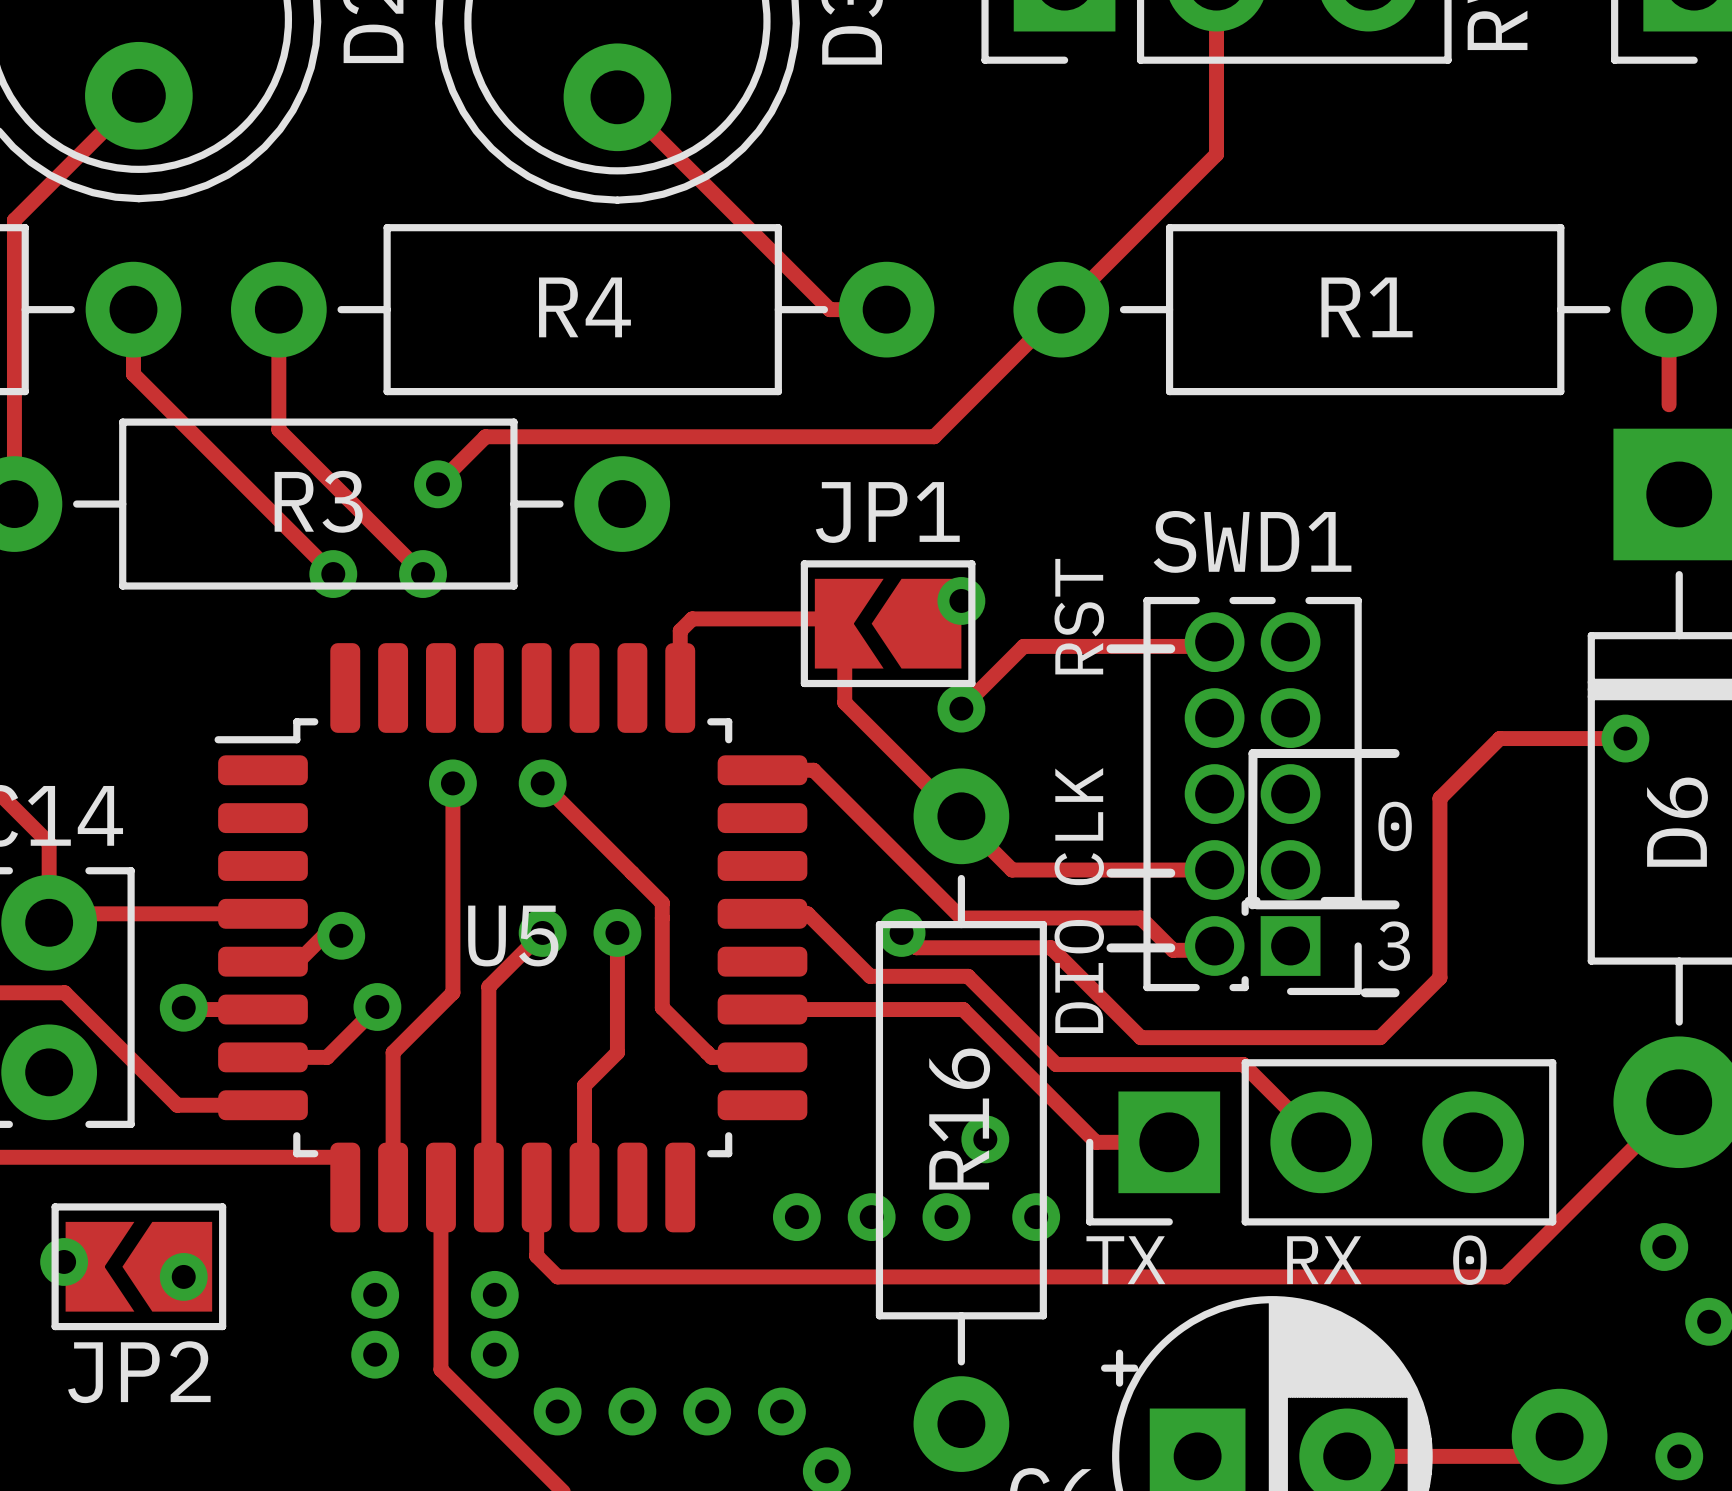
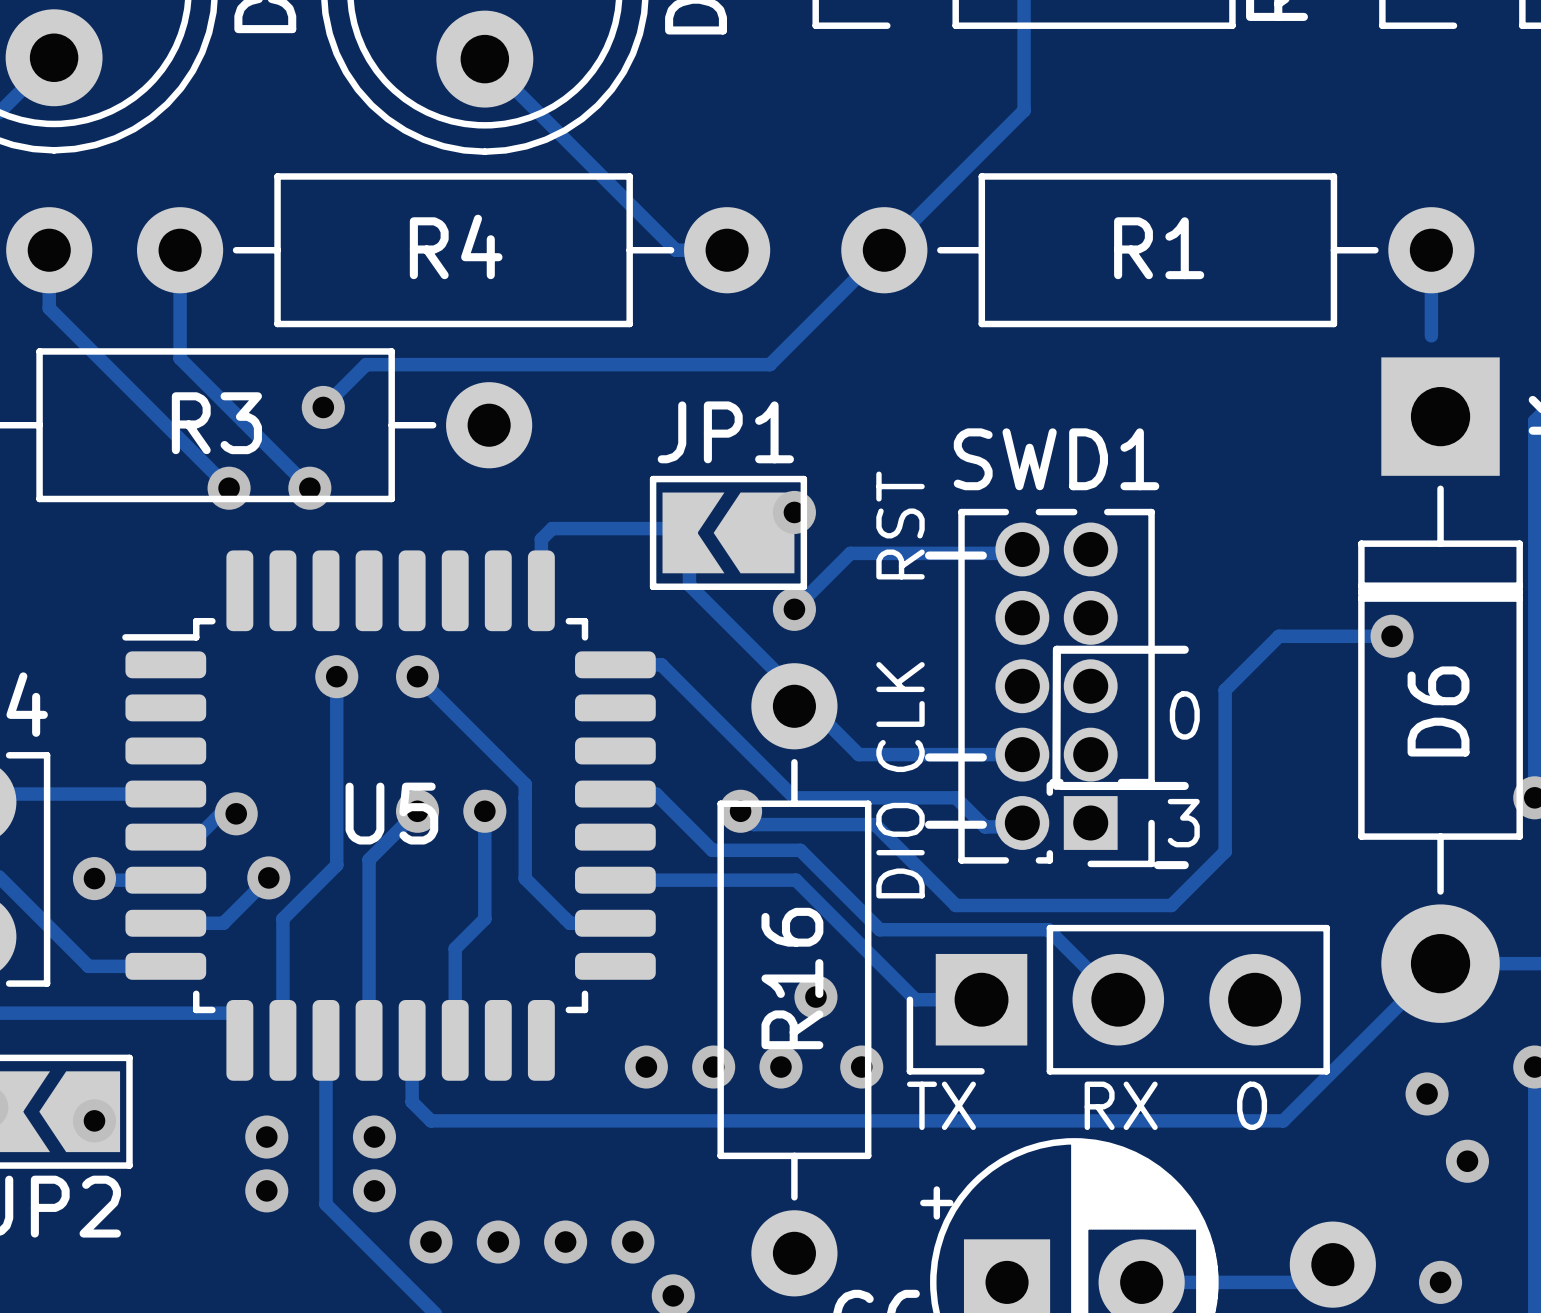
track: (844, 681) (844, 702) (1012, 870) (1033, 870) -> (689, 585) (858, 754)

